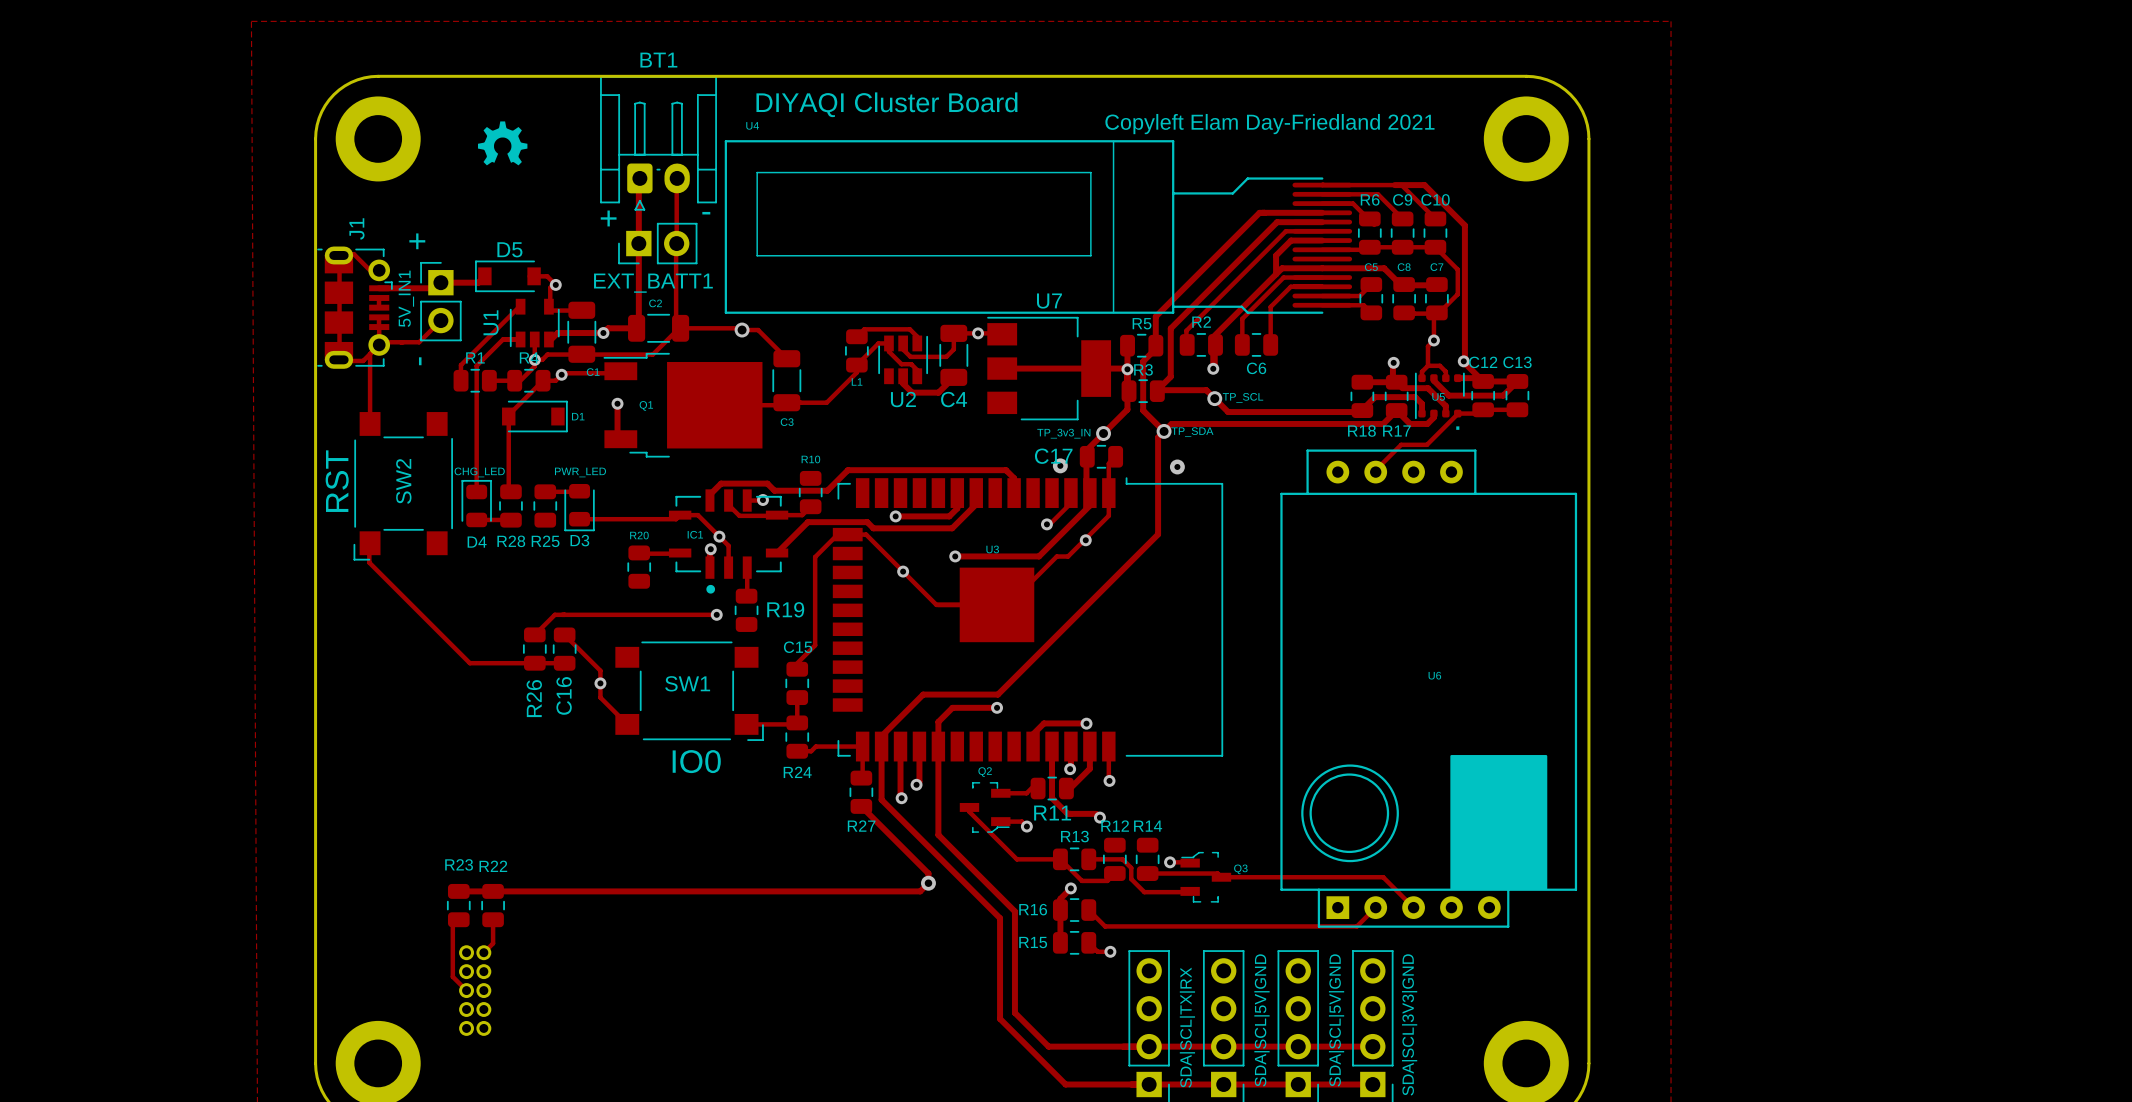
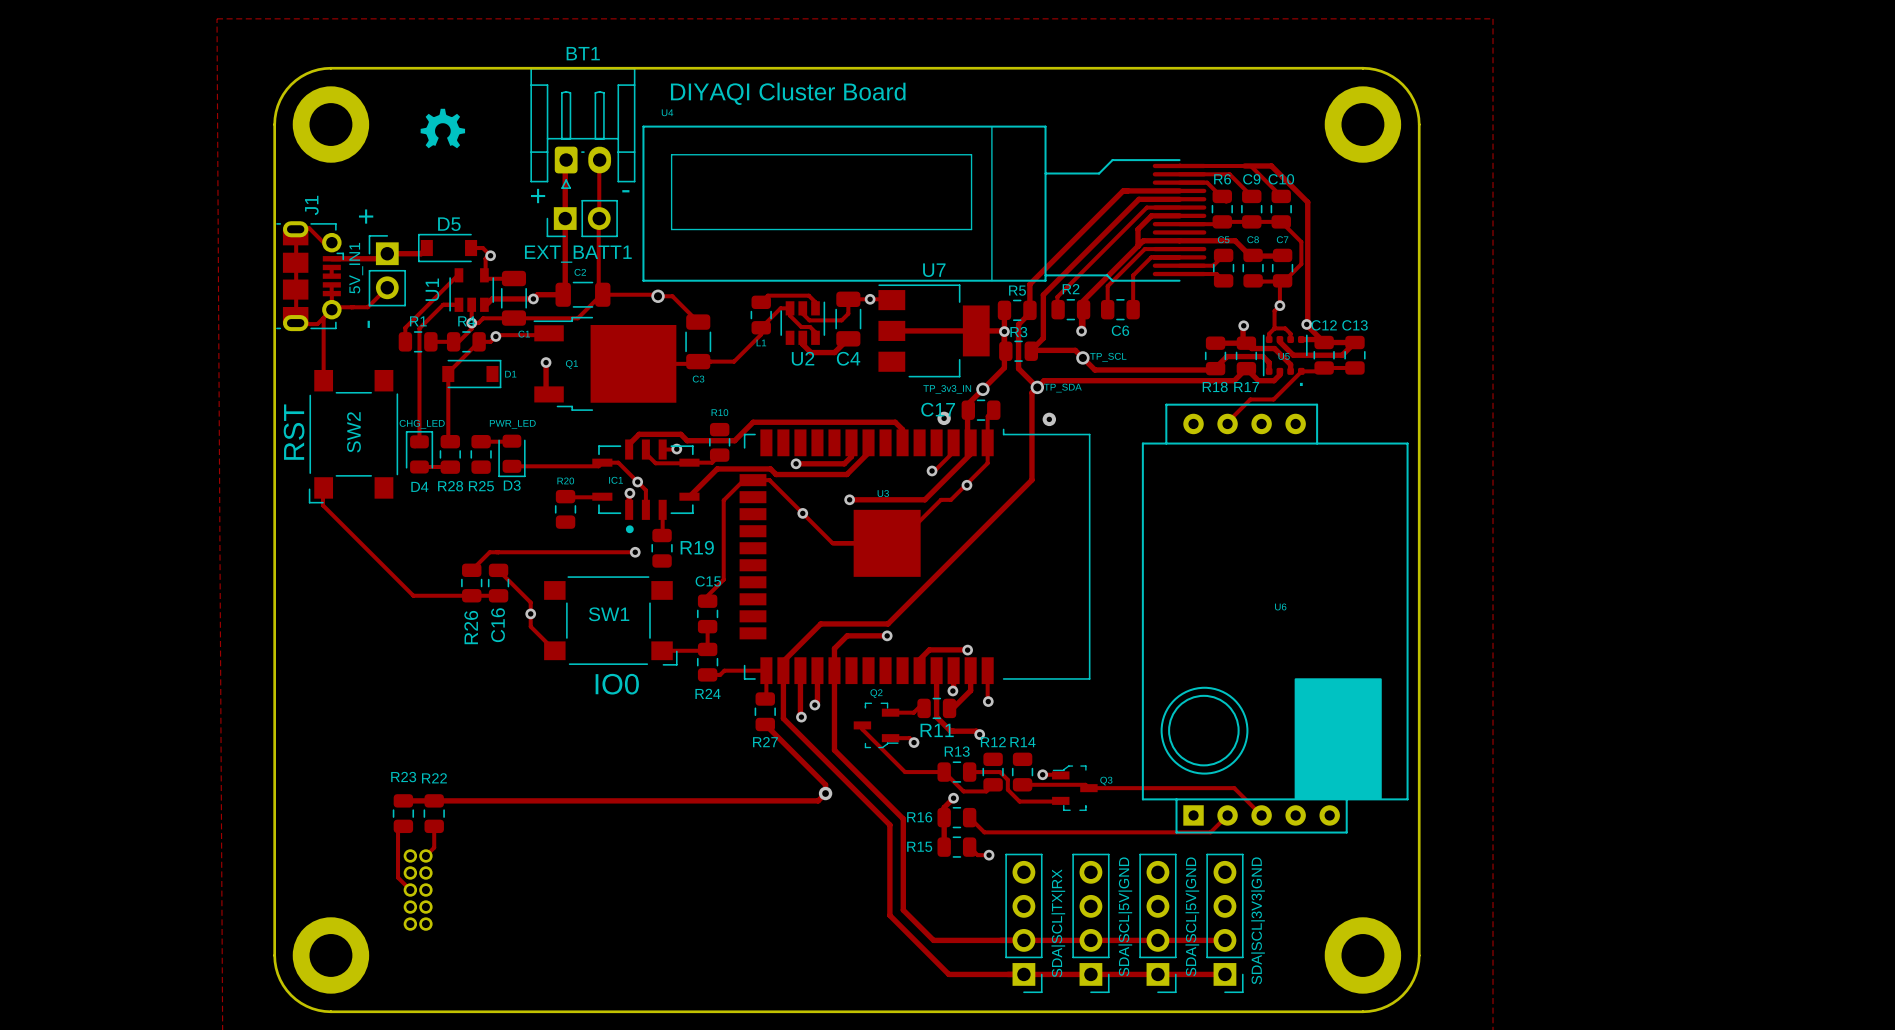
text: Copyleft Elam Day-Friedland 2021 (1269, 124) -> none

